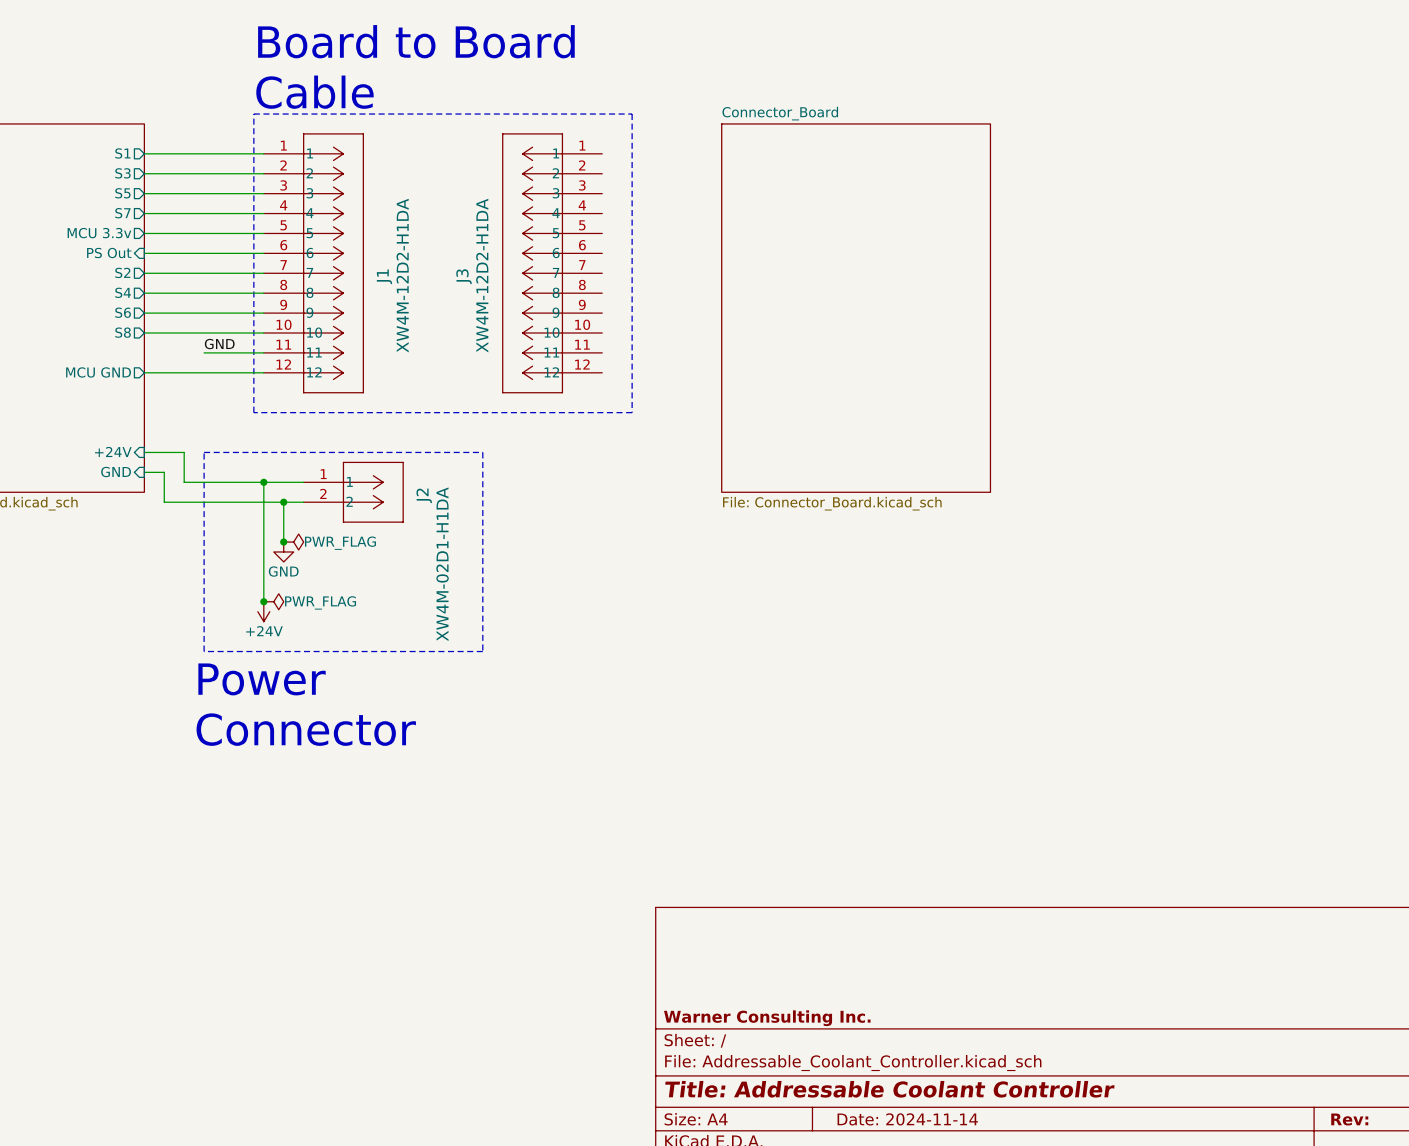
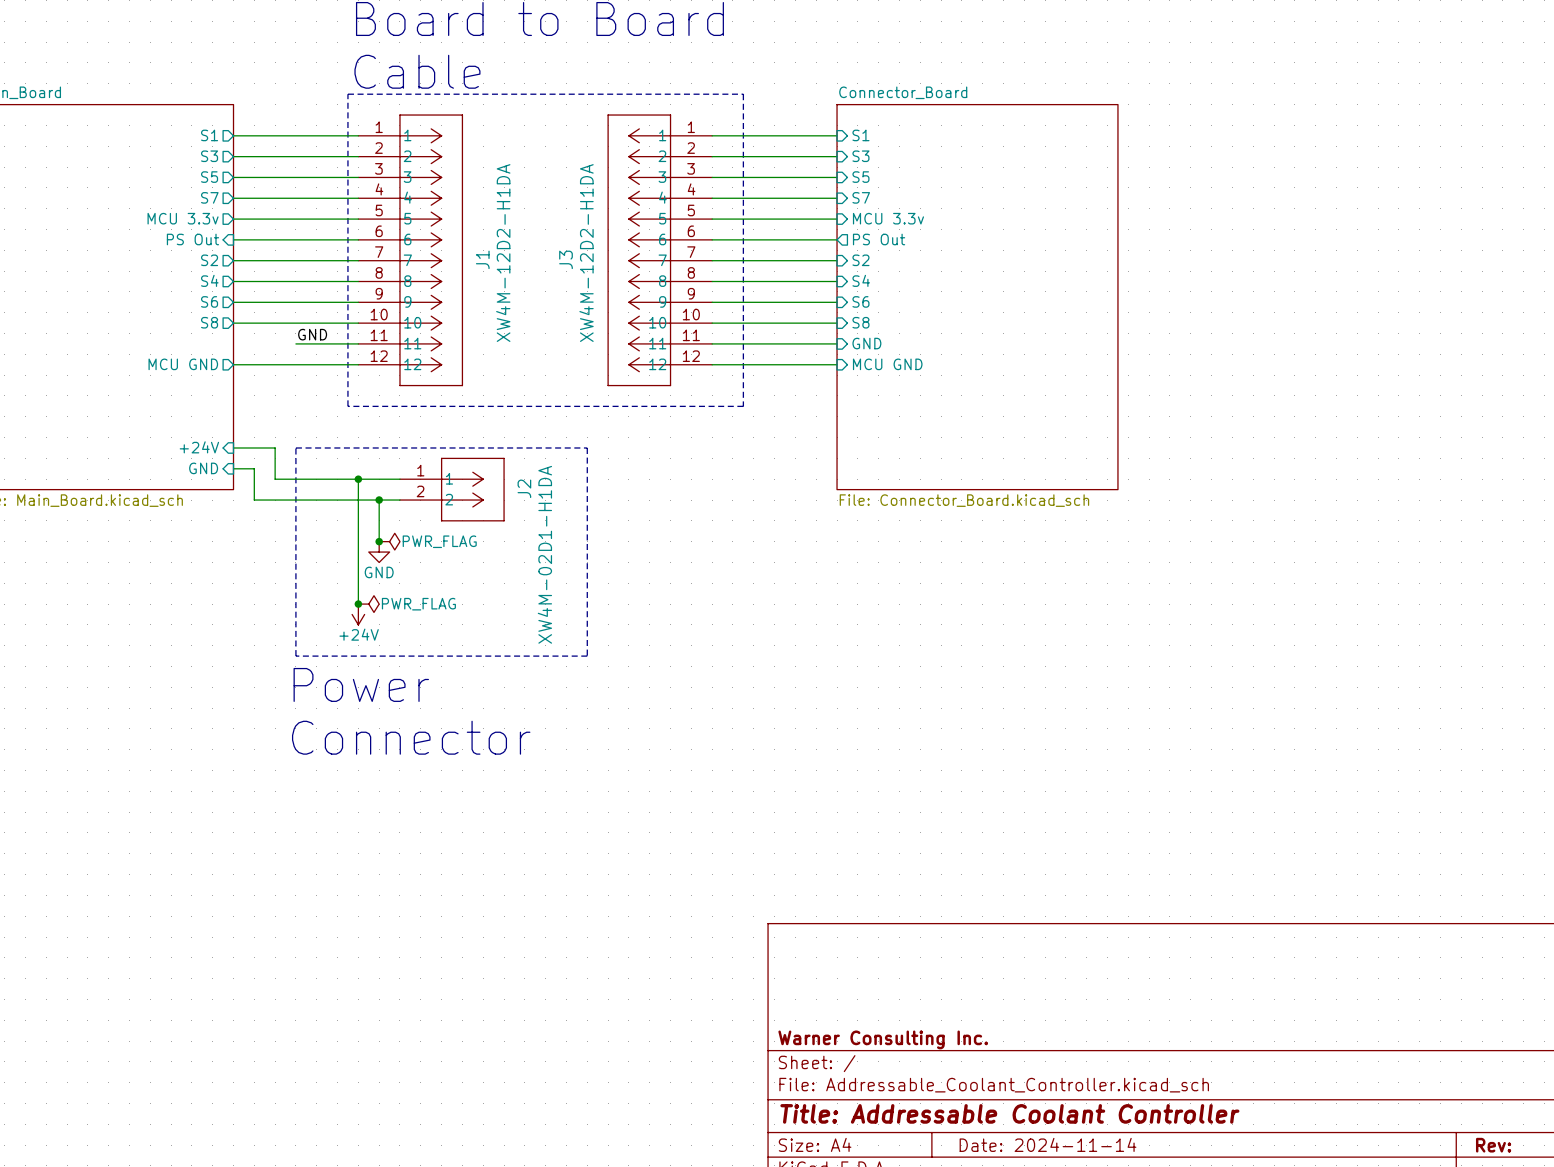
wire: none -> (712, 135) (837, 135)
sheet pin: none -> S1 (860, 135)
wire: none -> (712, 156) (837, 156)
sheet pin: none -> S3 (860, 156)
wire: none -> (712, 177) (837, 177)
sheet pin: none -> S5 (860, 177)
wire: none -> (712, 198) (837, 198)
sheet pin: none -> S7 (861, 197)
wire: none -> (712, 219) (837, 219)
sheet pin: none -> MCU 3.3v (888, 218)
wire: none -> (712, 239) (837, 239)
sheet pin: none -> PS Out (879, 239)
sheet pin: none -> S2 (860, 260)
wire: none -> (712, 260) (837, 260)
sheet pin: none -> S4 (861, 280)
wire: none -> (712, 281) (837, 281)
sheet pin: none -> S6 (860, 301)
wire: none -> (712, 302) (837, 302)
sheet pin: none -> S8 (860, 322)
wire: none -> (712, 323) (837, 323)
wire: none -> (712, 343) (837, 343)
sheet pin: none -> GND (866, 343)
wire: none -> (712, 364) (837, 364)
sheet pin: none -> MCU GND (887, 364)

